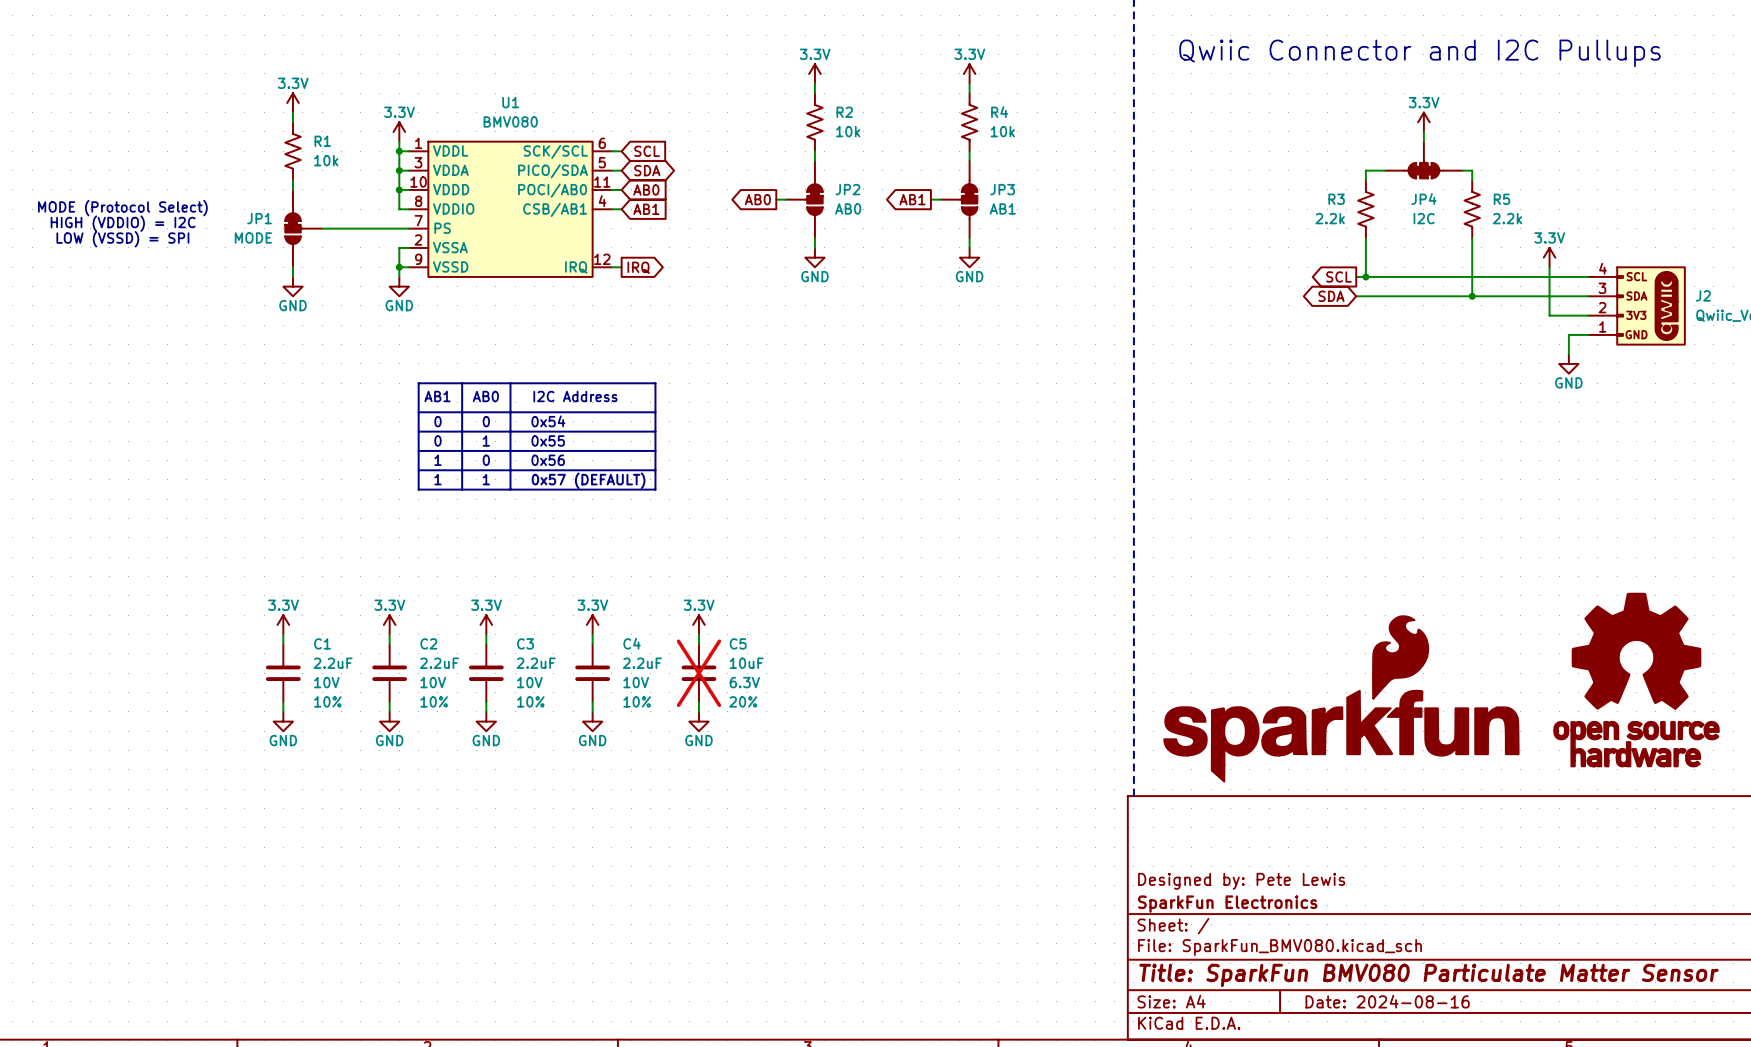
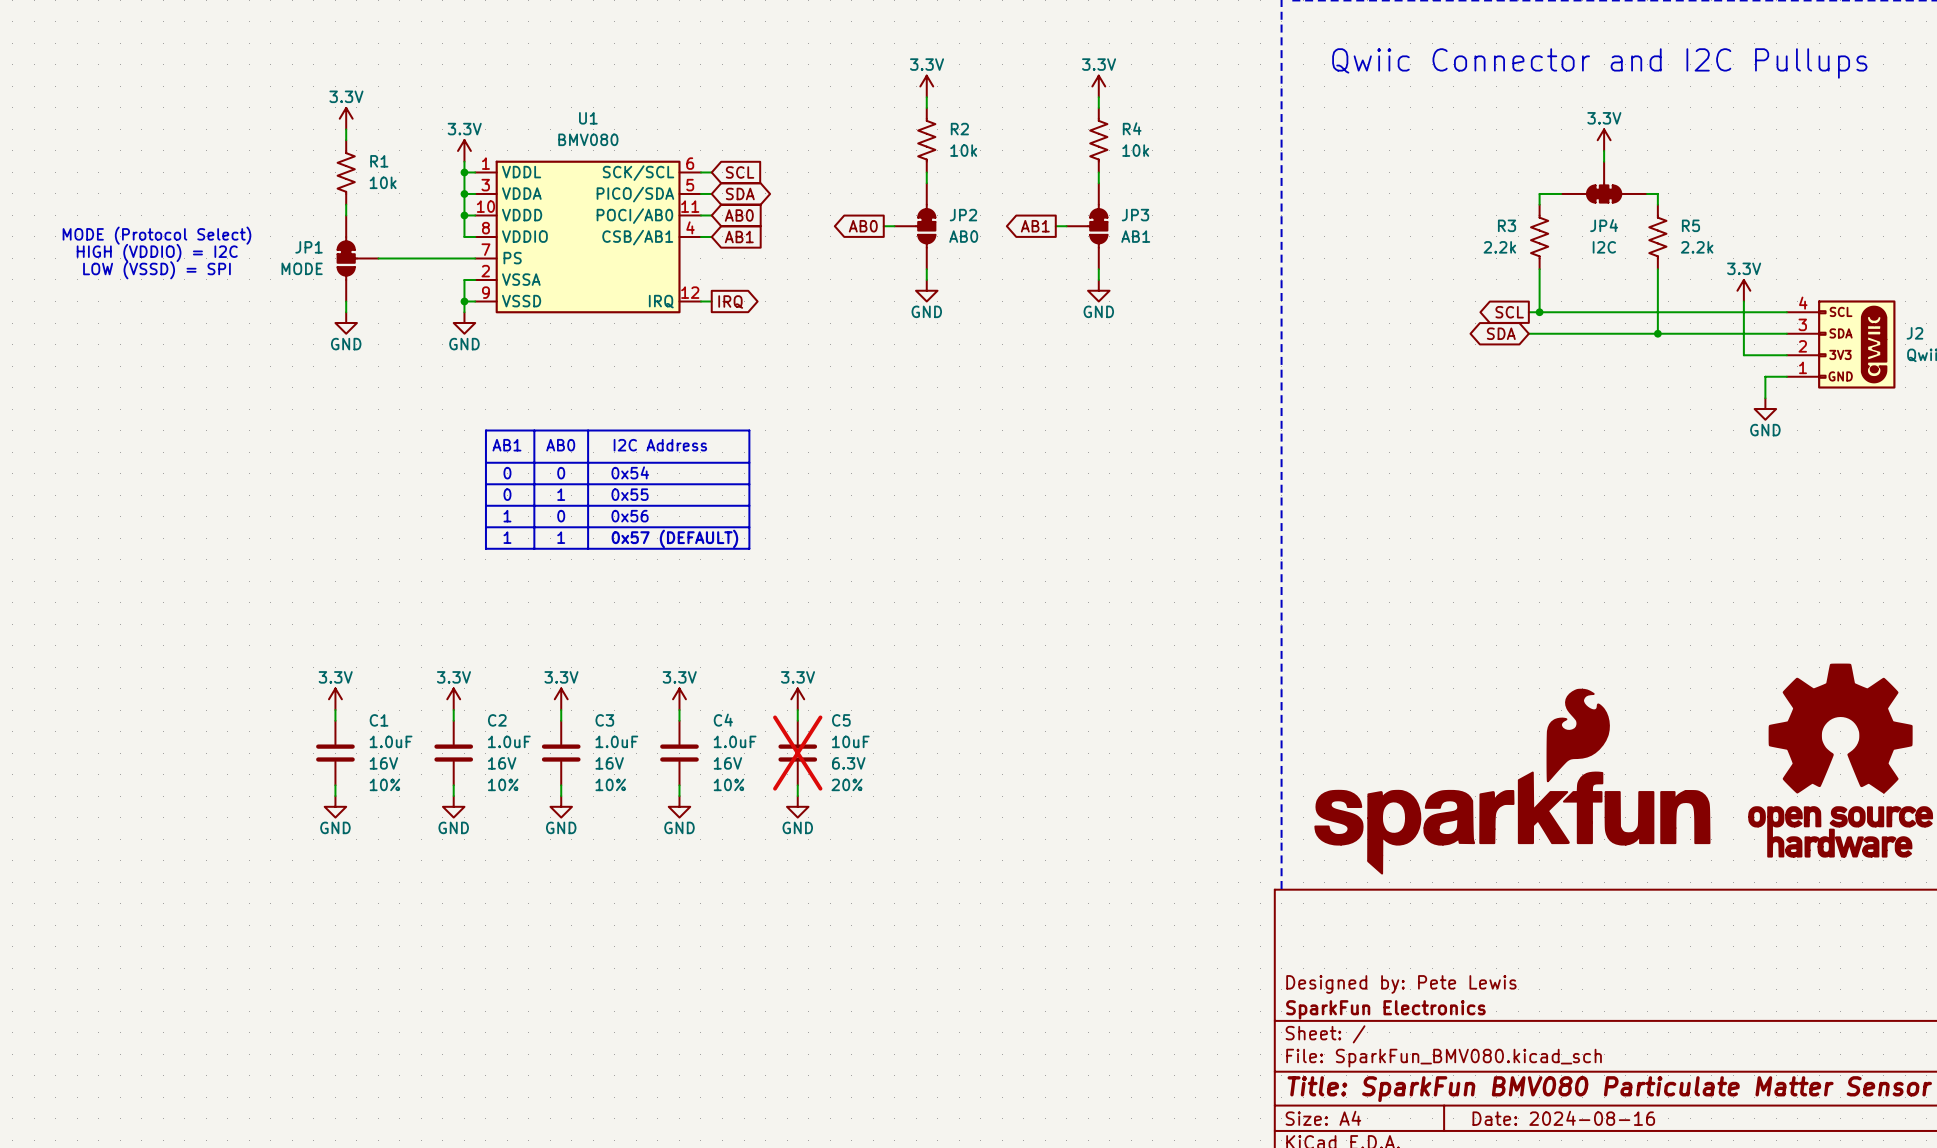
C1 value: 2.2uF (333, 663) -> 1.0uF (391, 741)
C2 value: 2.2uF (439, 663) -> 1.0uF (509, 741)
C3 value: 2.2uF (536, 663) -> 1.0uF (616, 741)
C4 value: 2.2uF (642, 663) -> 1.0uF (735, 741)
C1 text: 10V (326, 682) -> 16V (383, 763)
C2 text: 10V (433, 682) -> 16V (502, 763)
C3 text: 10V (529, 682) -> 16V (609, 763)
C4 text: 10V (636, 682) -> 16V (727, 763)

